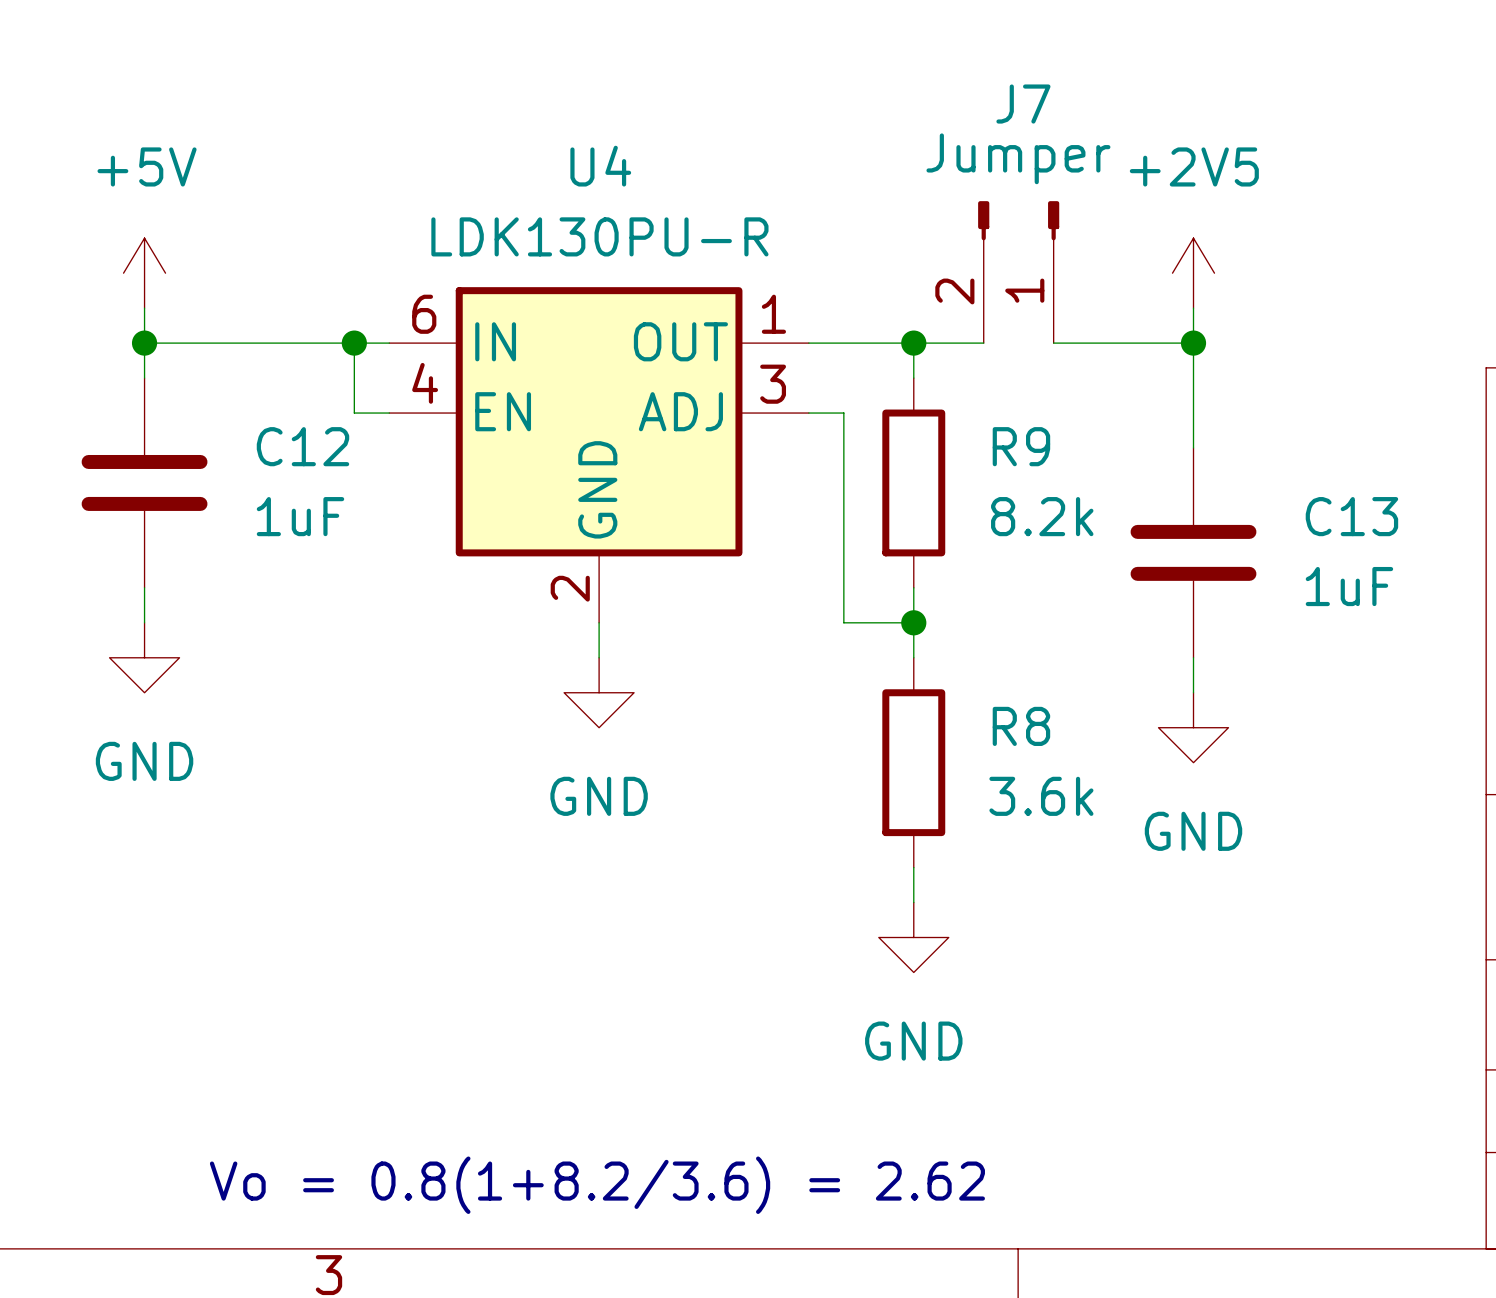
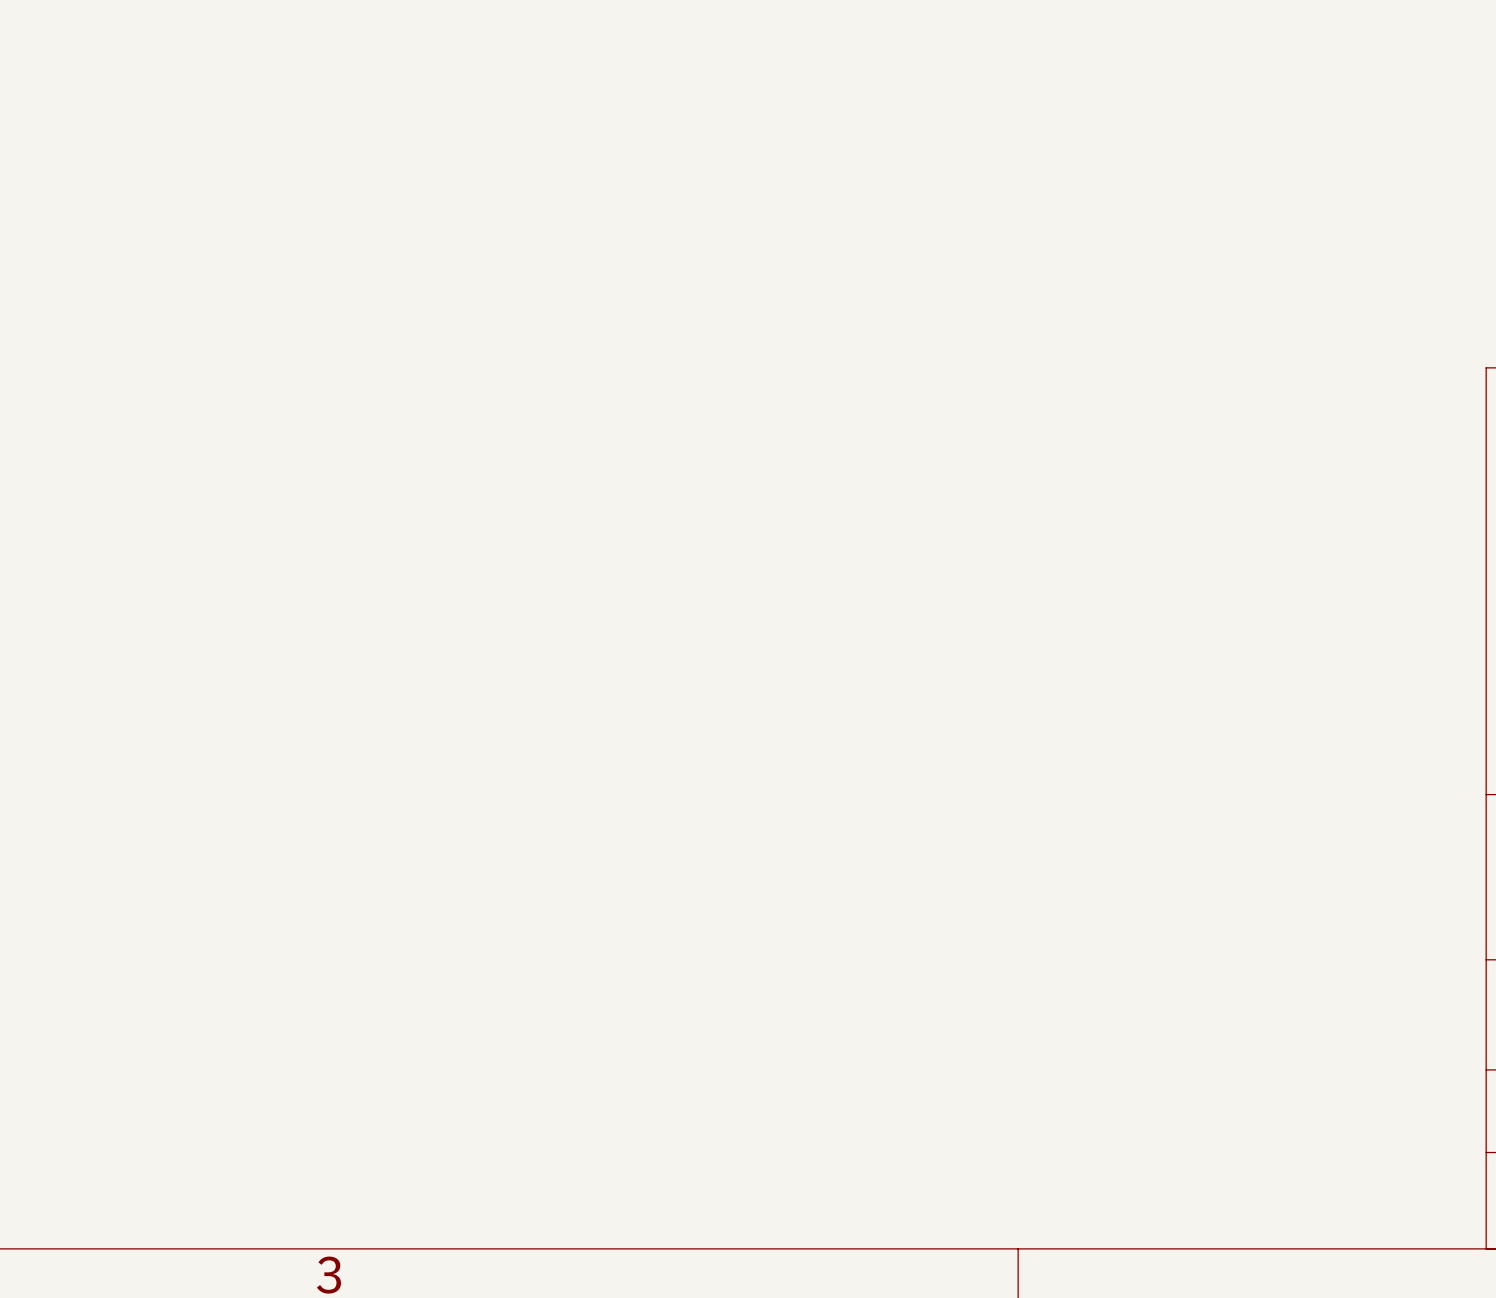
J7: Jumper (1018, 272) -> none
power symbol: +5V (144, 273) -> none
power symbol: +2V5 (1193, 273) -> none
wire: (144, 308) (144, 378) -> none
wire: (1193, 308) (1193, 447) -> none
wire: (144, 343) (389, 343) -> none
junction: (144, 343) -> none
wire: (354, 343) (354, 413) (389, 413) -> none
junction: (354, 343) -> none
wire: (808, 343) (983, 343) -> none
wire: (913, 343) (913, 378) -> none
junction: (913, 343) -> none
wire: (1053, 343) (1193, 343) -> none
junction: (1193, 343) -> none
wire: (808, 413) (843, 413) (843, 622) (913, 622) -> none
U4: LDK130PU-R (599, 454) -> none
C12: 1uF (144, 482) -> none
R9: 8.2k (913, 482) -> none
C13: 1uF (1193, 552) -> none
wire: (144, 587) (144, 622) -> none
wire: (913, 587) (913, 657) -> none
wire: (599, 622) (599, 657) -> none
junction: (913, 622) -> none
power symbol: GND (144, 657) -> none
wire: (1193, 657) (1193, 692) -> none
power symbol: GND (599, 692) -> none
power symbol: GND (1193, 727) -> none
R8: 3.6k (913, 762) -> none
wire: (913, 867) (913, 902) -> none
power symbol: GND (913, 937) -> none
text: Vo = 0.8(1+8.2/3.6) = 2.62 (597, 1185) -> none

